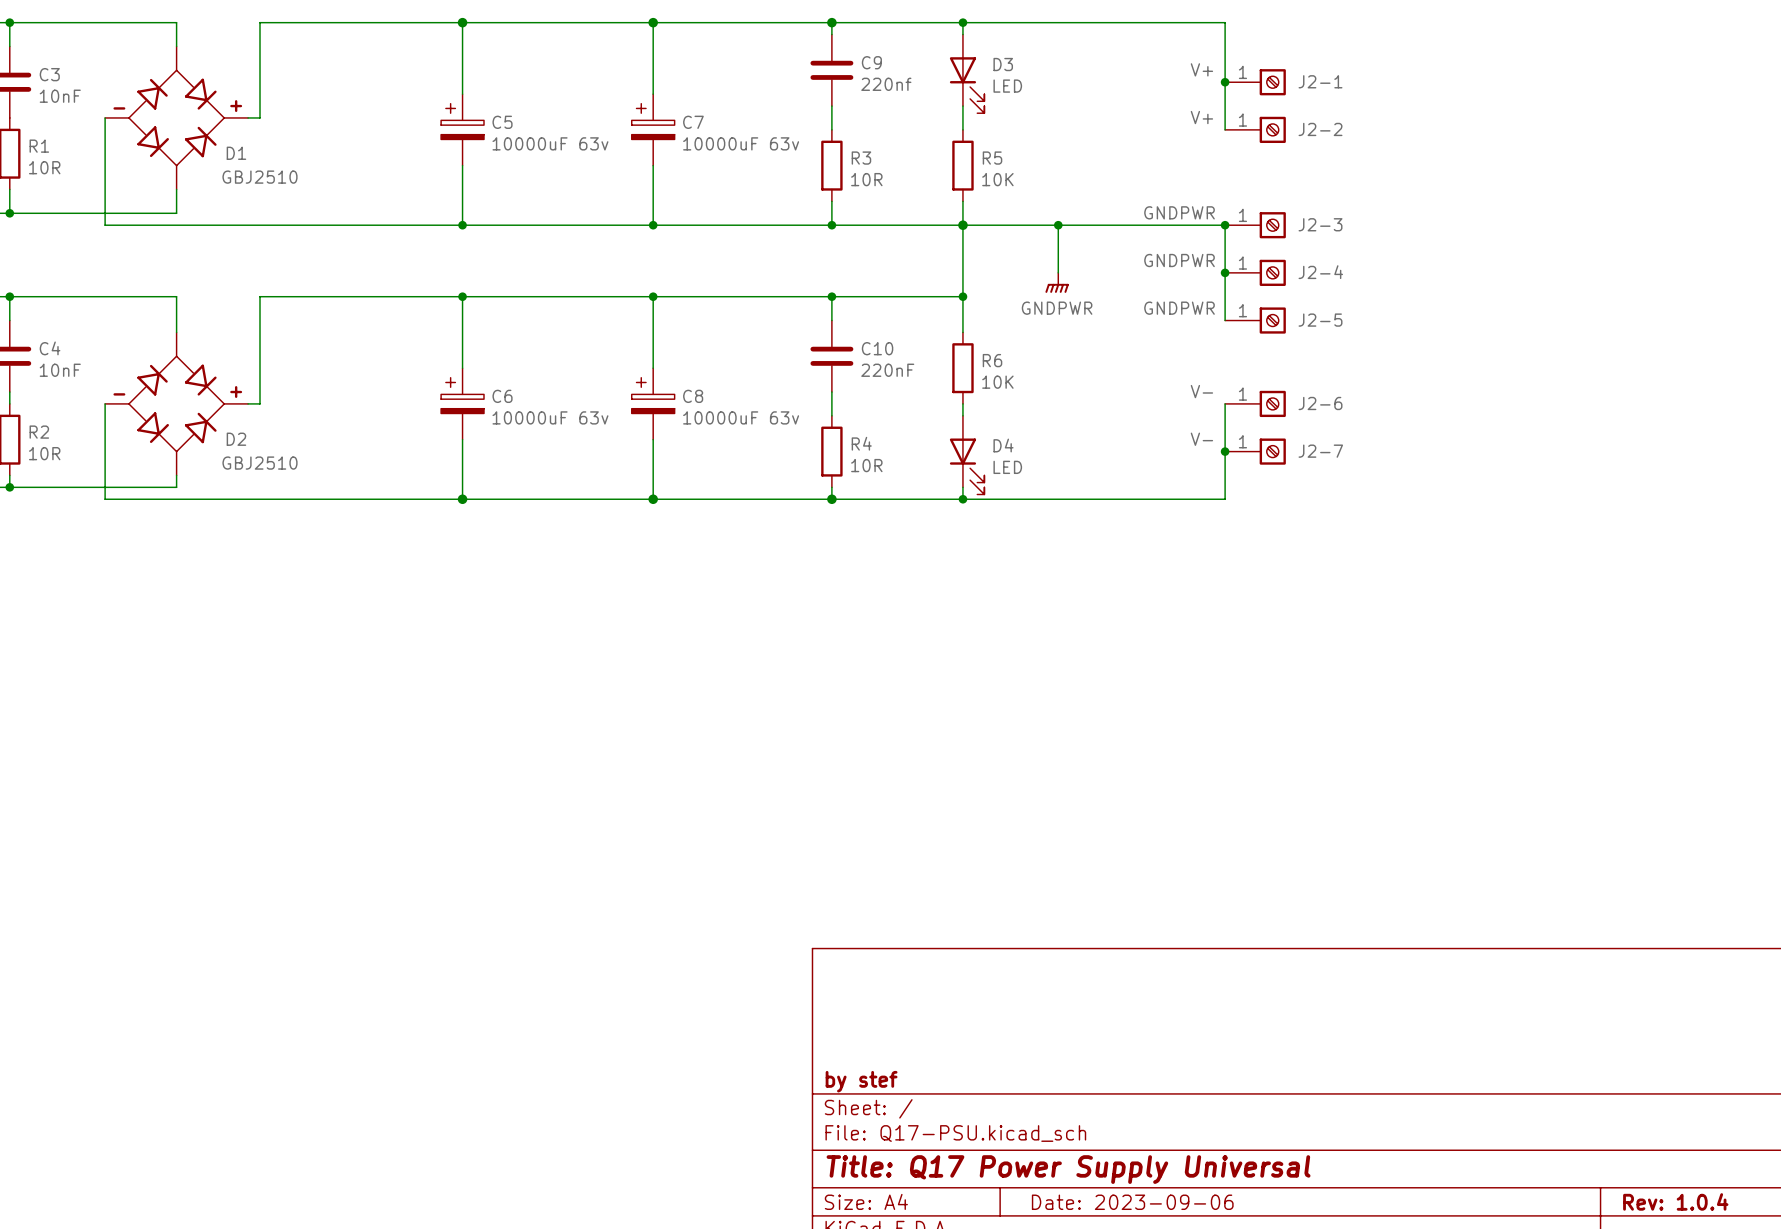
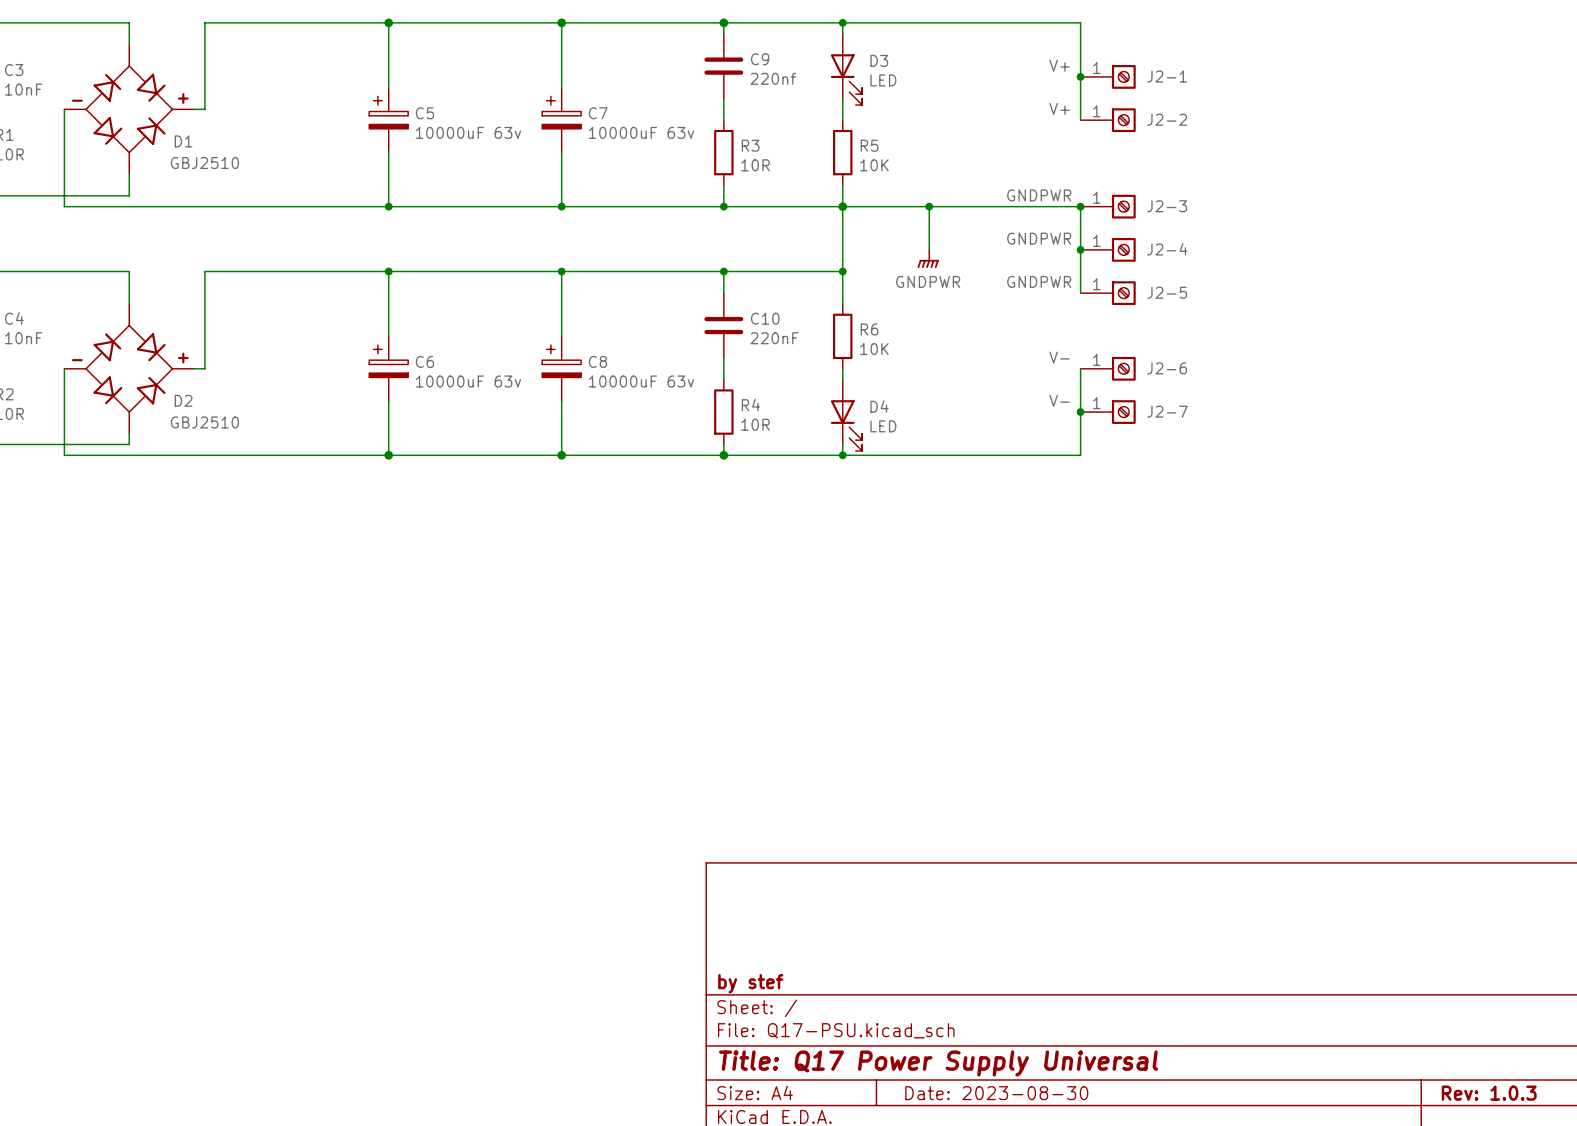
title block: Rev: 1.0.4 (1675, 1201) -> Rev: 1.0.3 (1489, 1093)
title block: Date: 2023-09-06 (1132, 1202) -> Date: 2023-08-30 (996, 1093)

